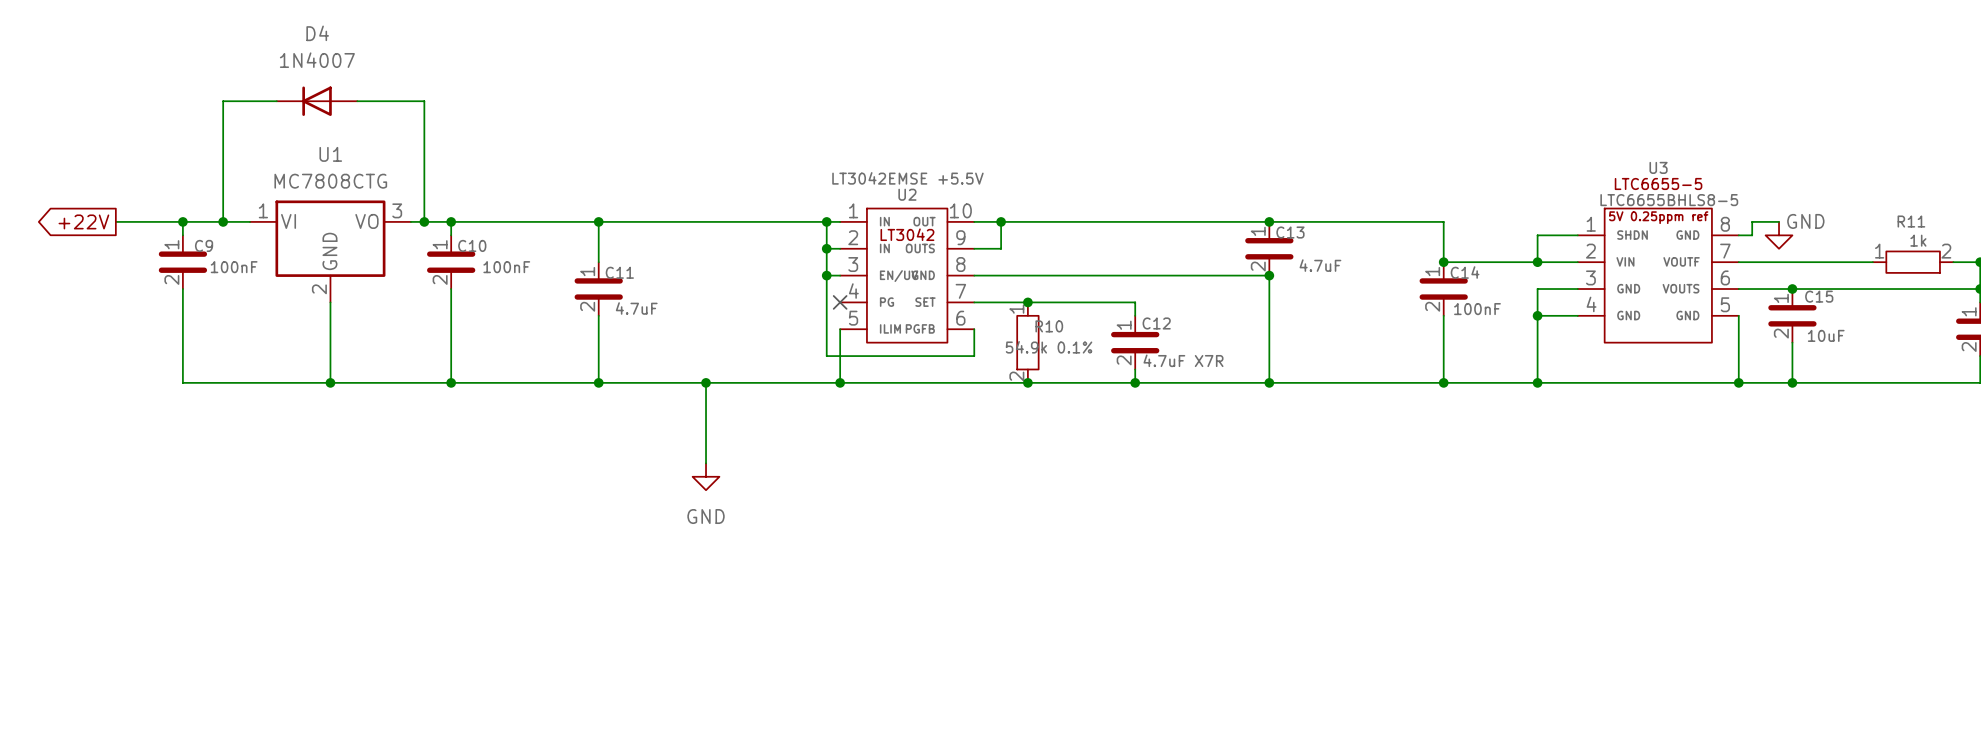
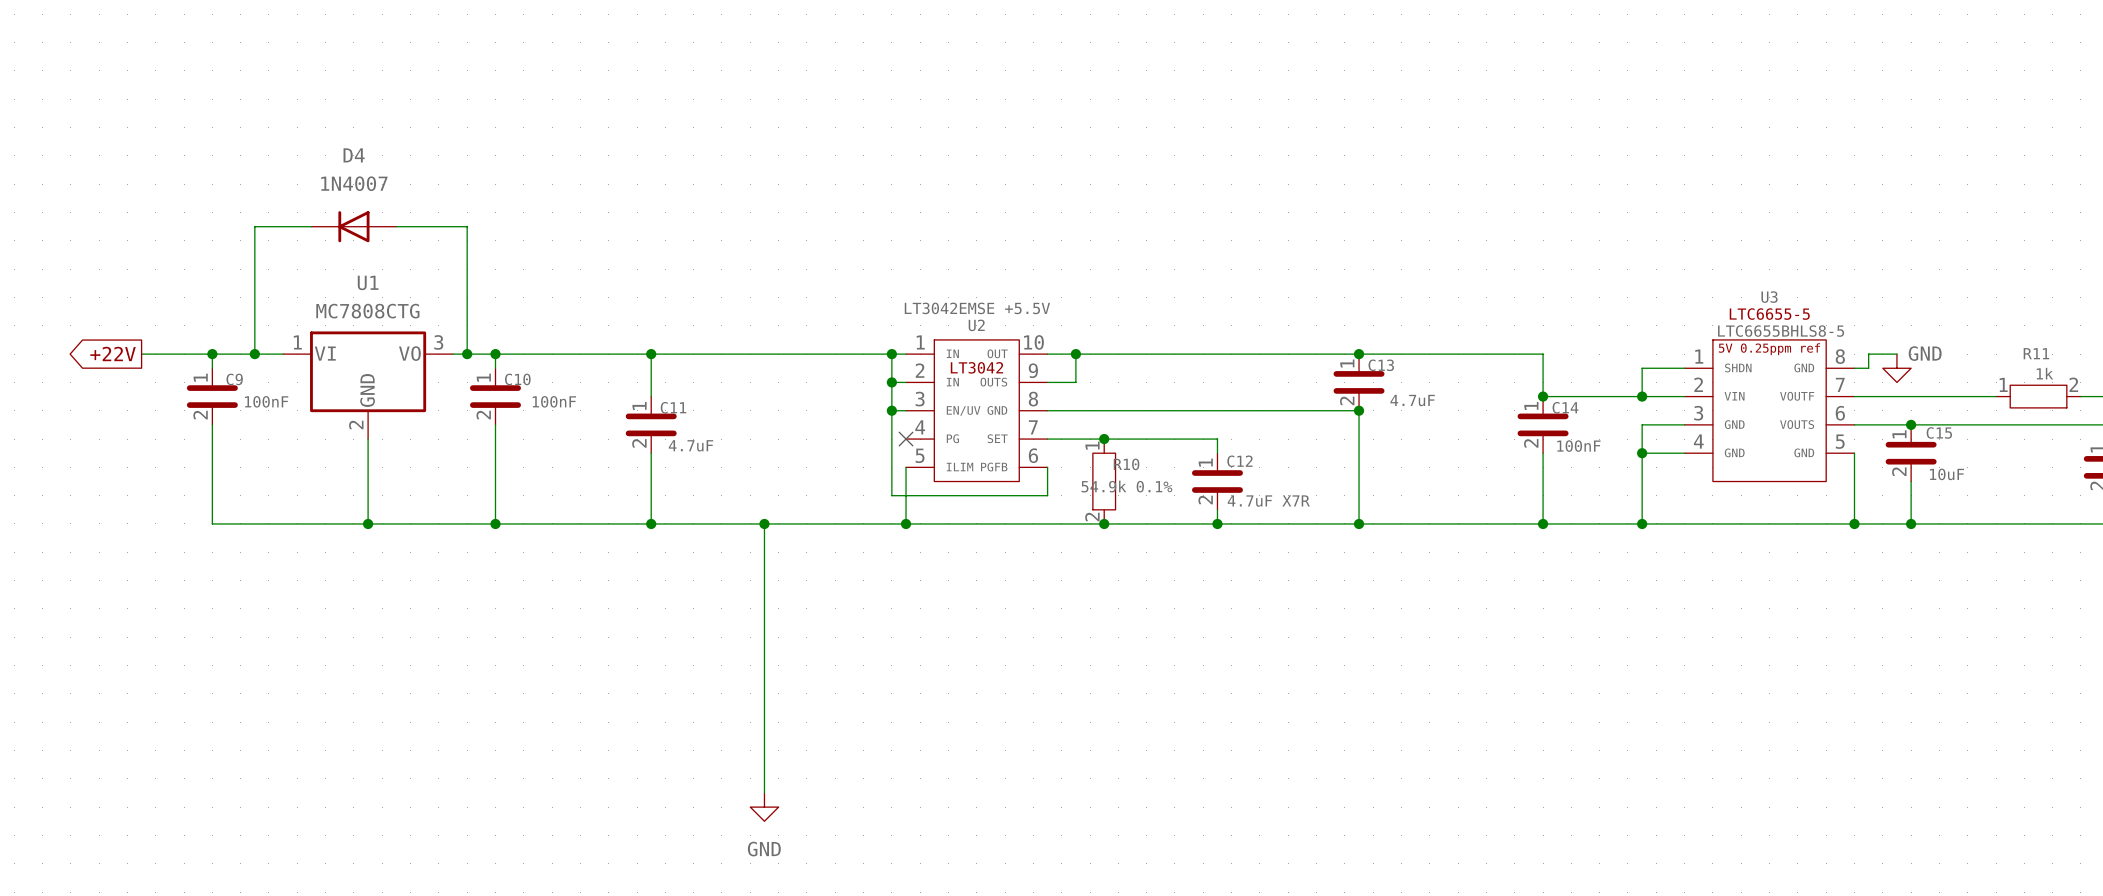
wire: none -> (764, 608) (764, 792)
power symbol position: GND (706, 476) -> GND (764, 807)

